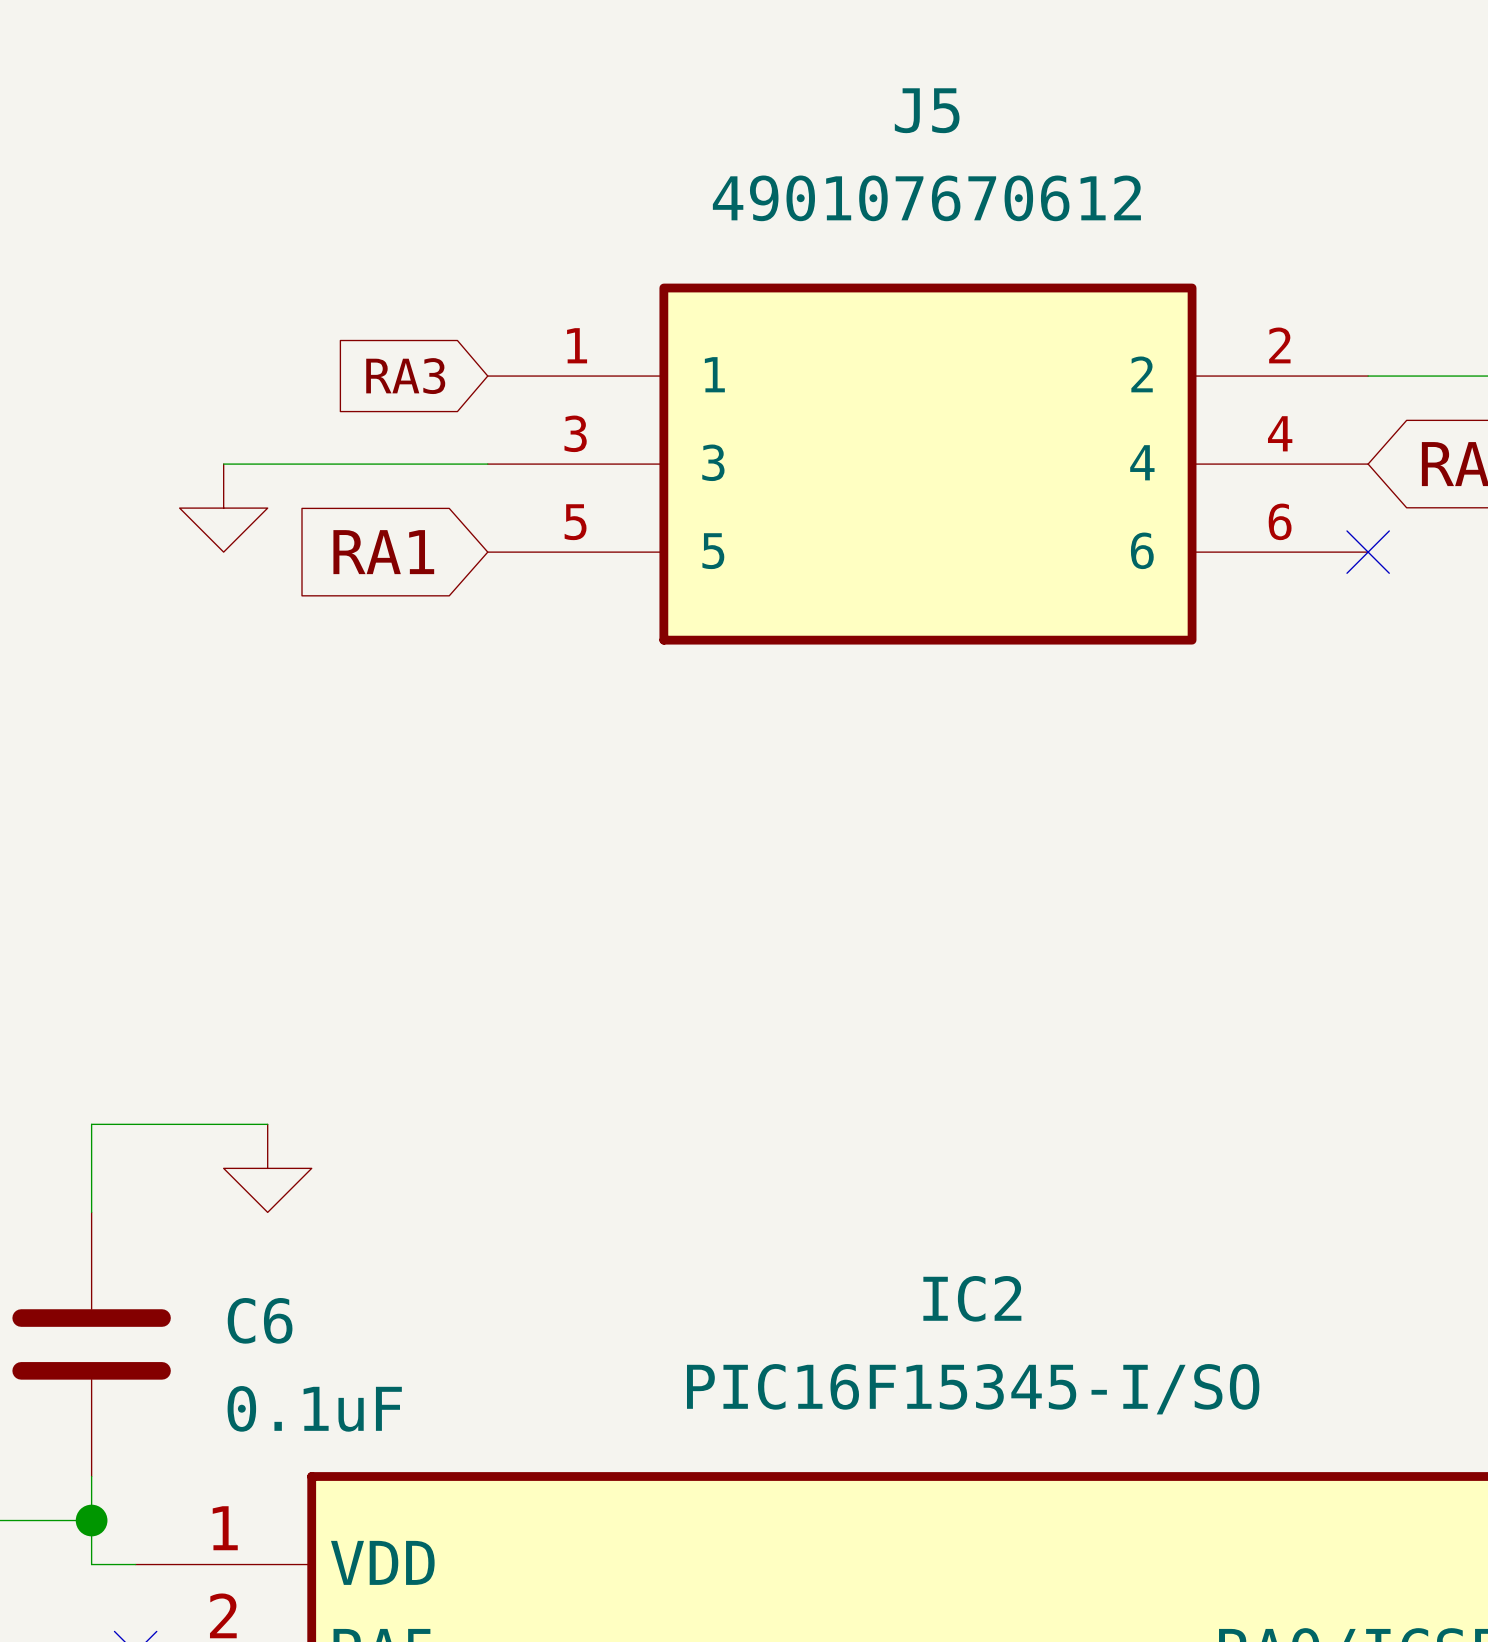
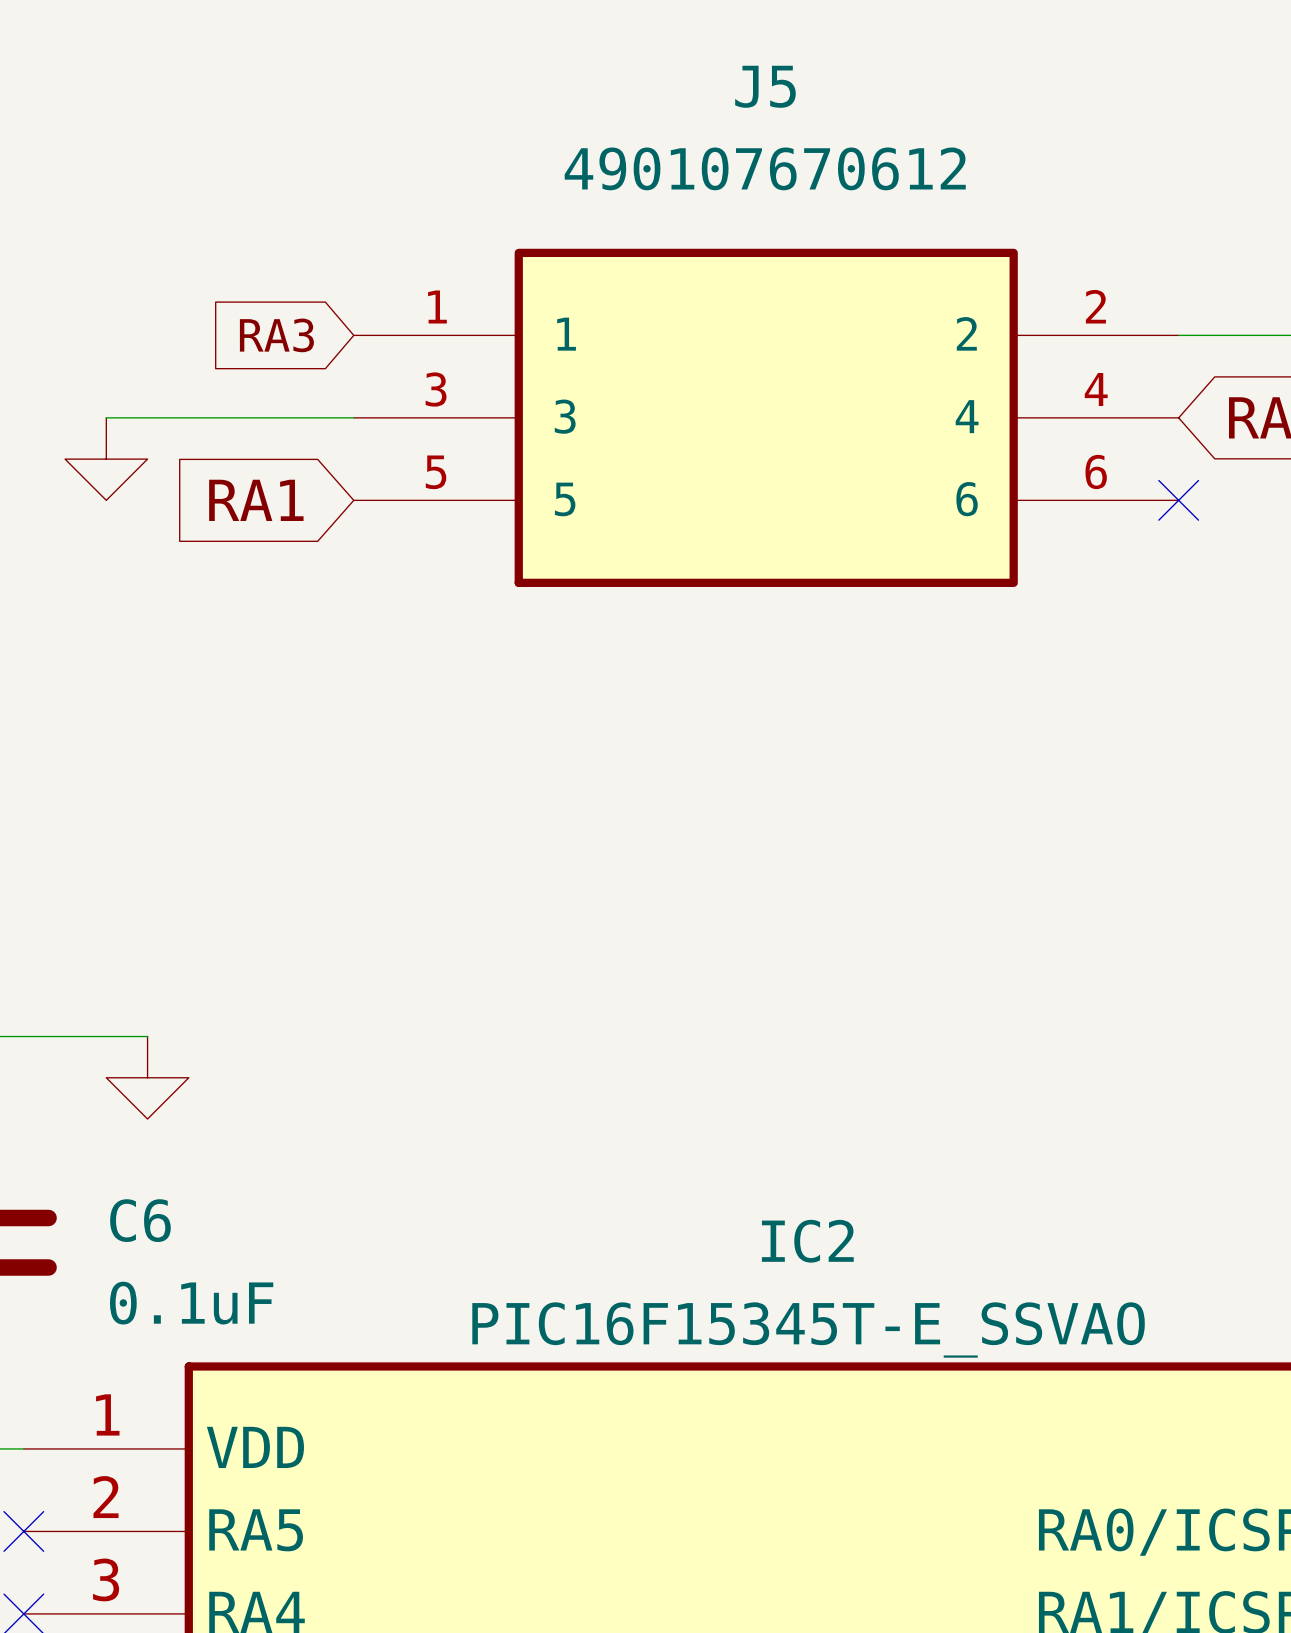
IC2 name position: IC2 (972, 1298) -> IC2 (807, 1241)
IC2 value: PIC16F15345-I/SO (973, 1389) -> PIC16F15345T-E_SSVAO (808, 1329)

